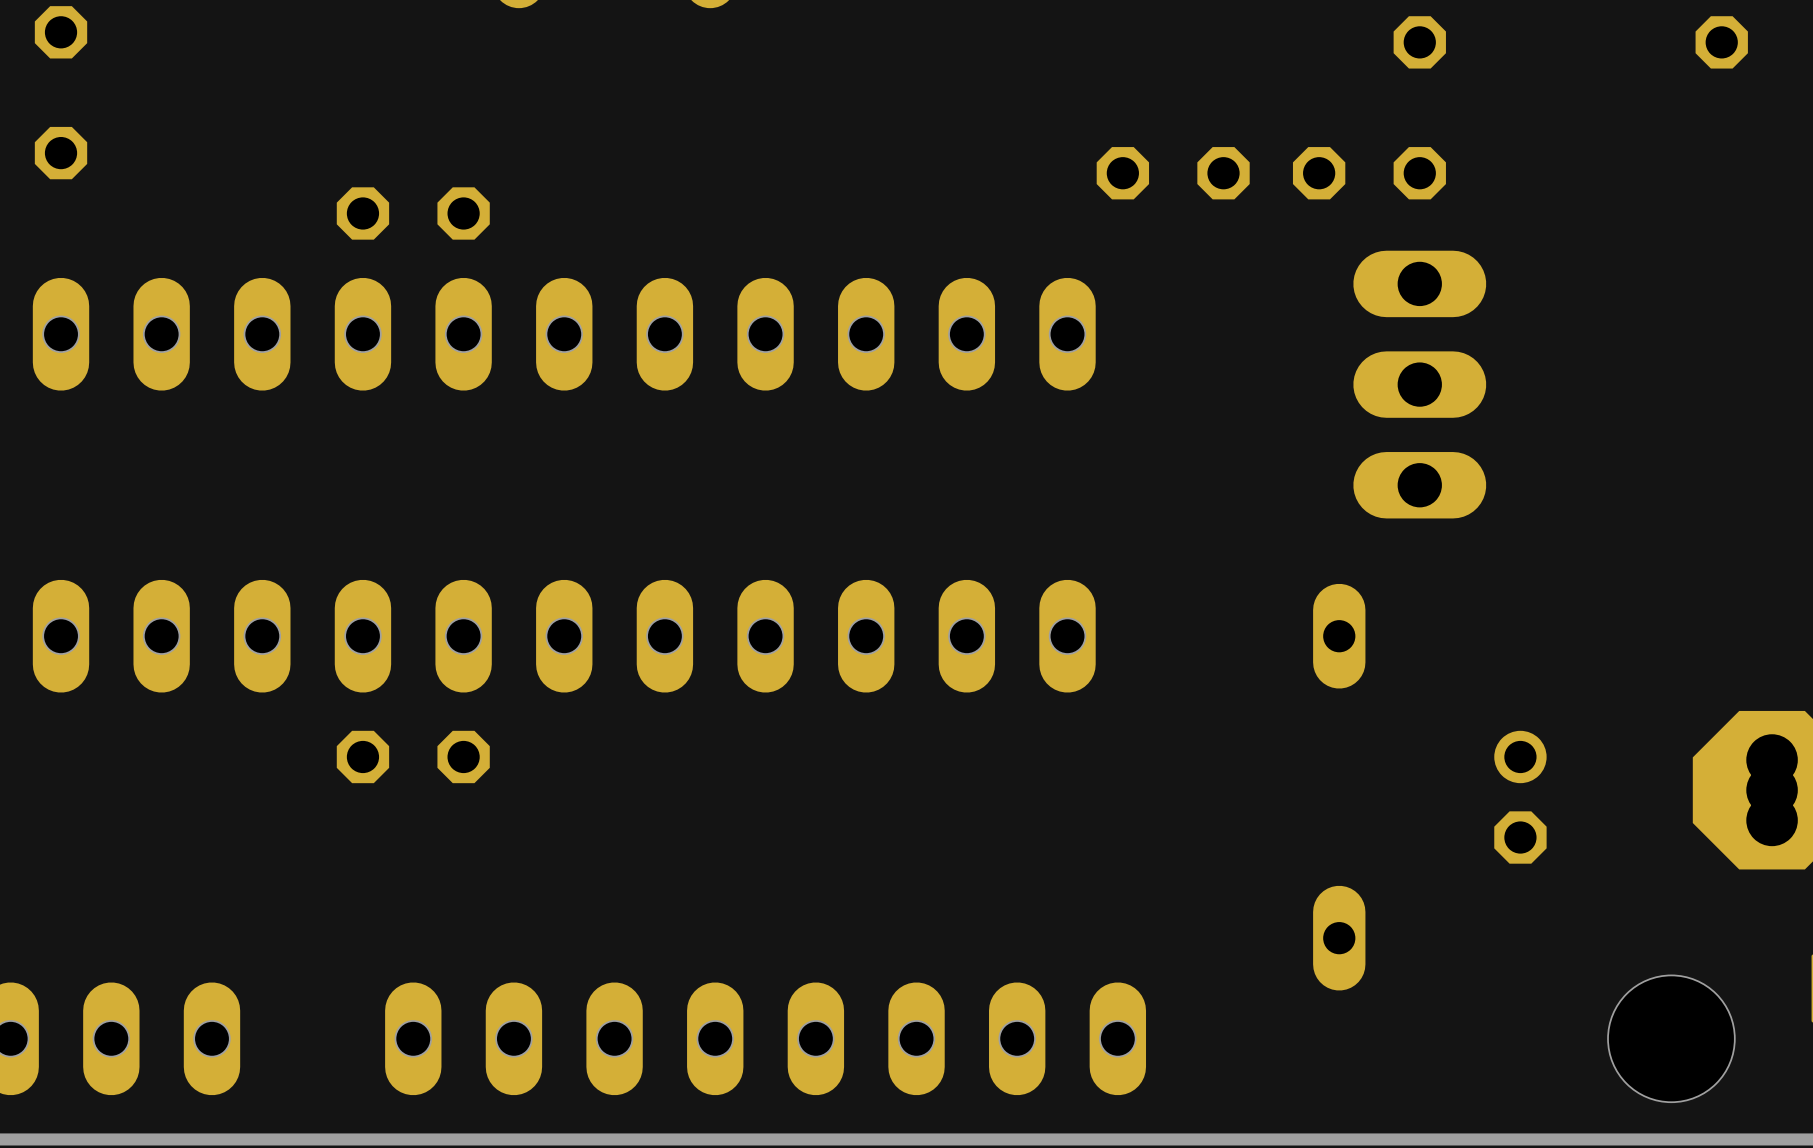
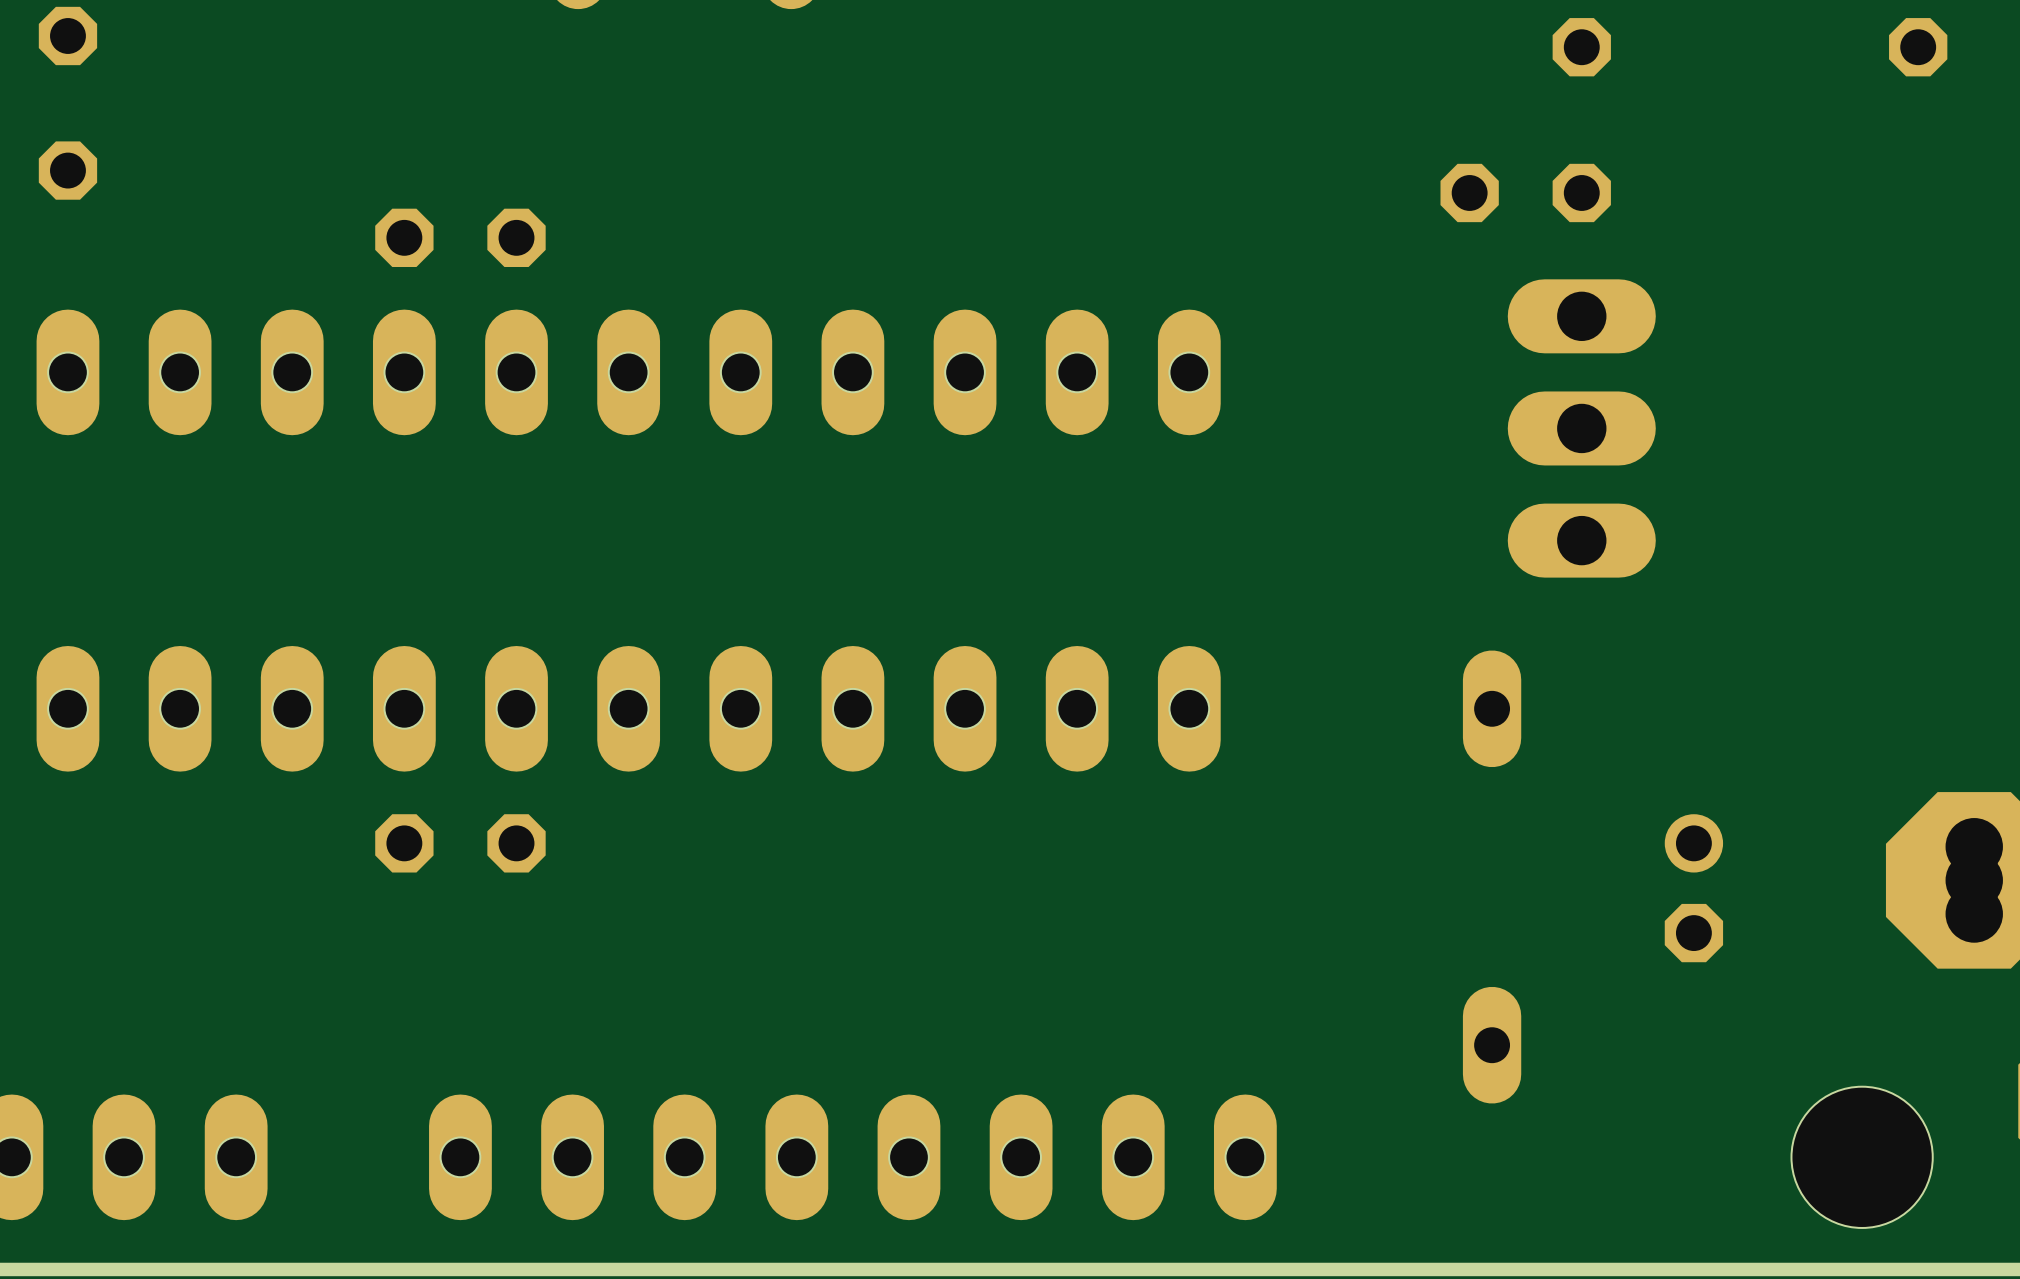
part: (1173, 173) -> none

